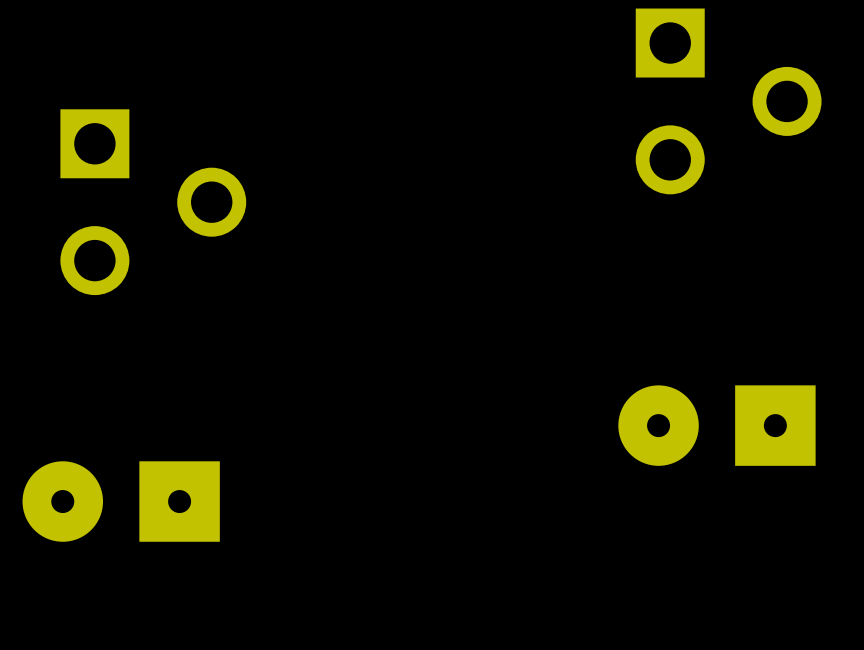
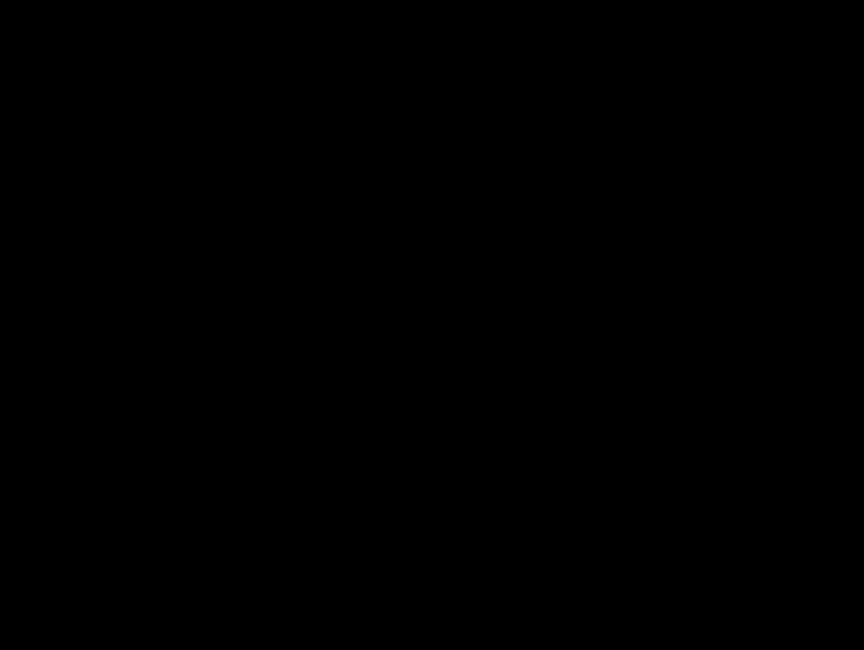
part: (728, 101) -> none
part: (153, 202) -> none
part: (716, 425) -> none
part: (121, 501) -> none

